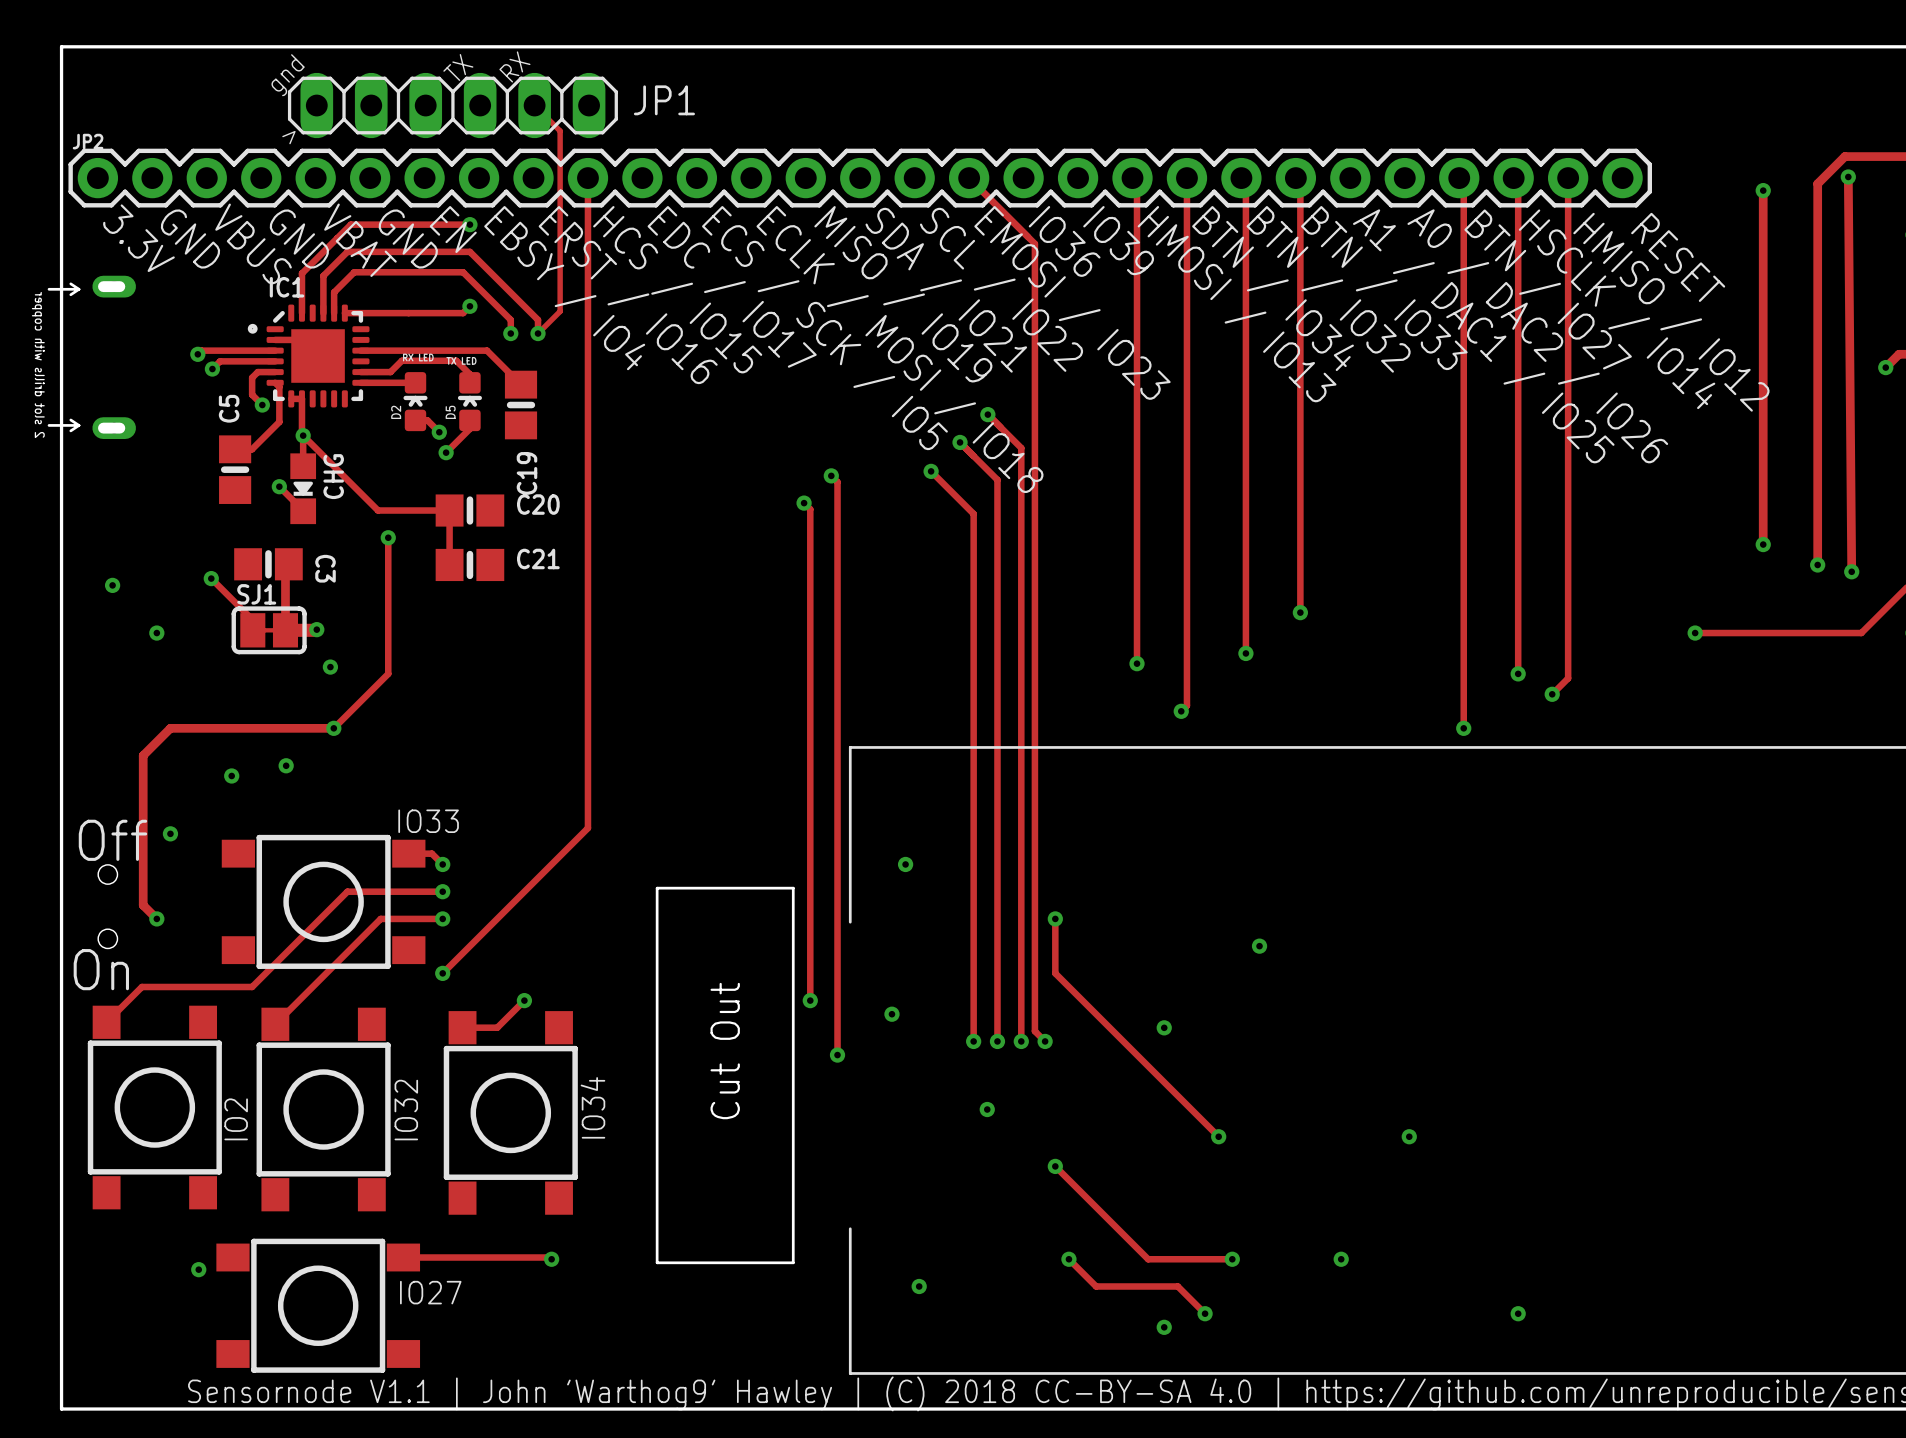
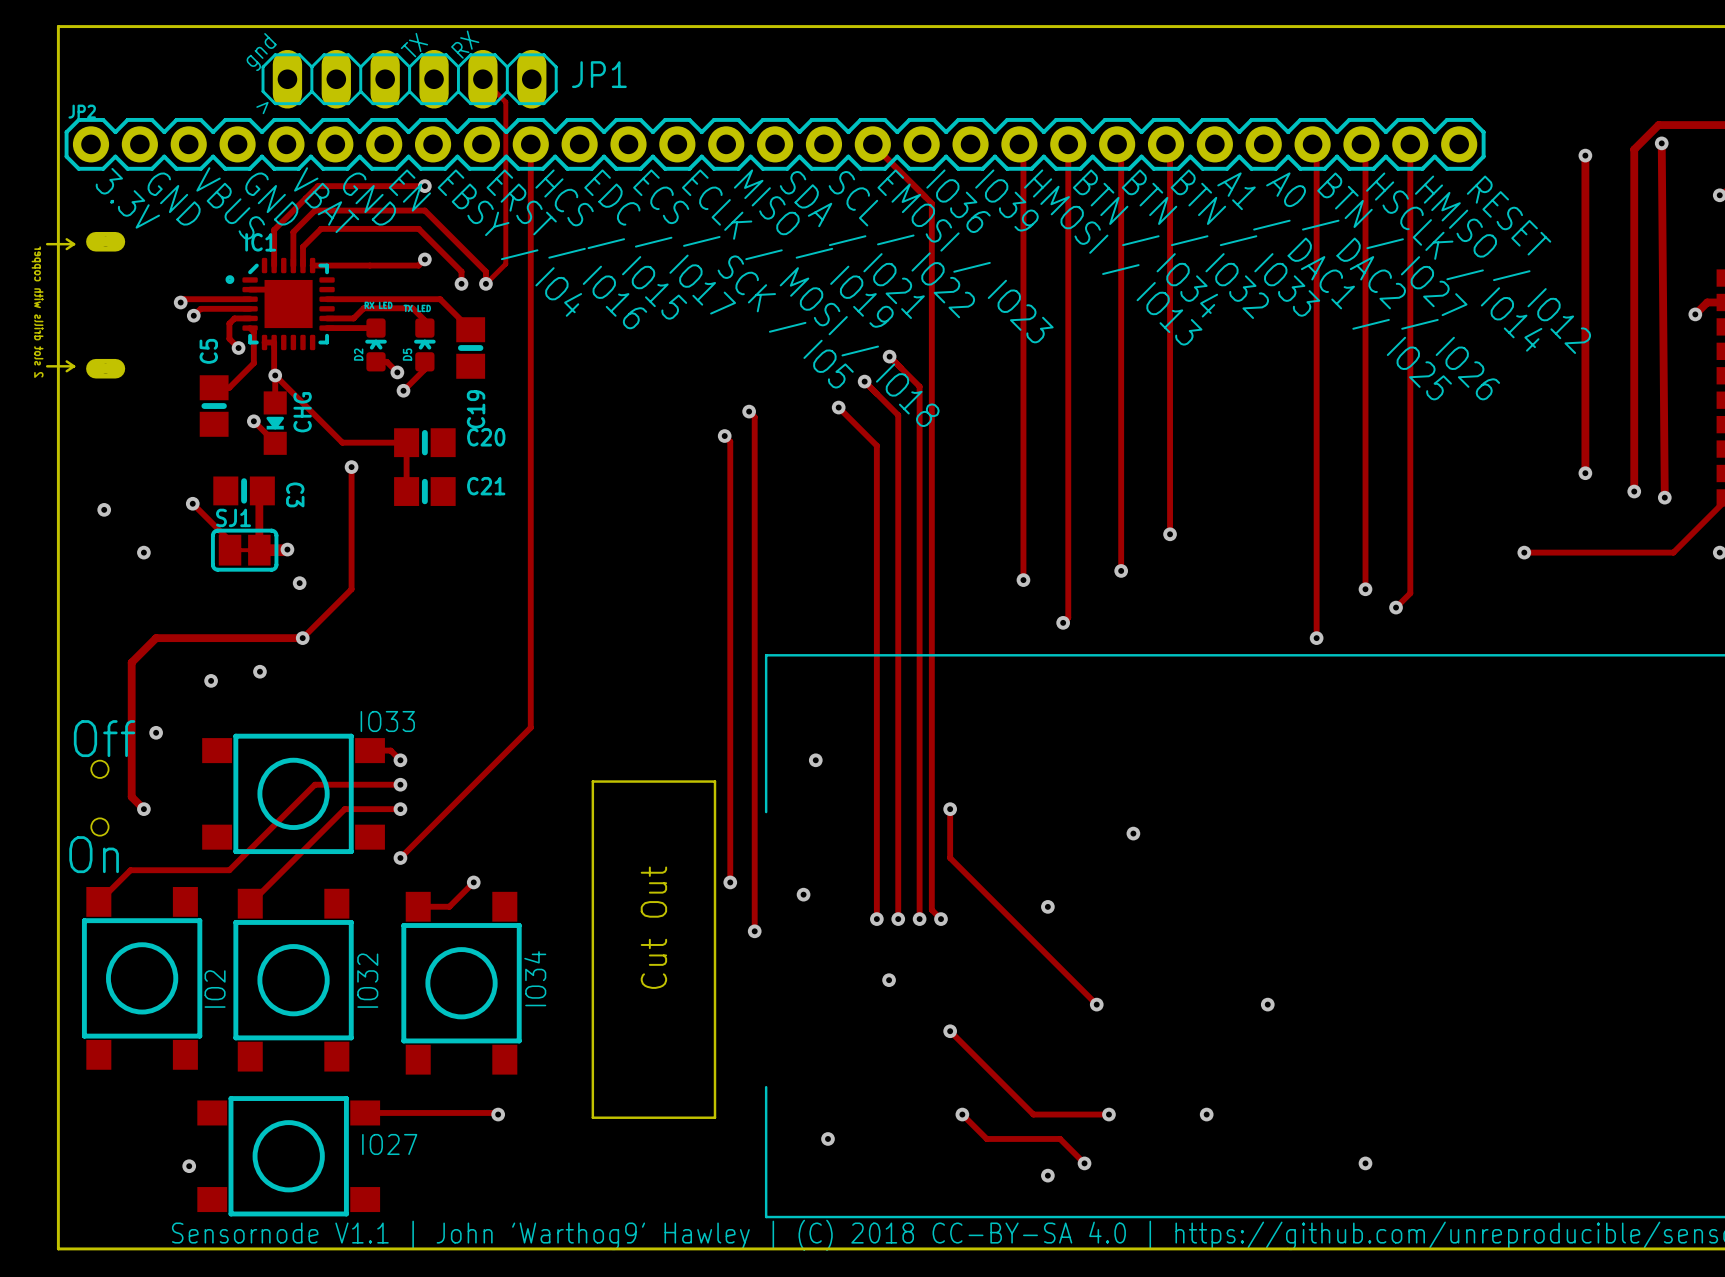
via position: (198, 1269) -> (189, 1166)

